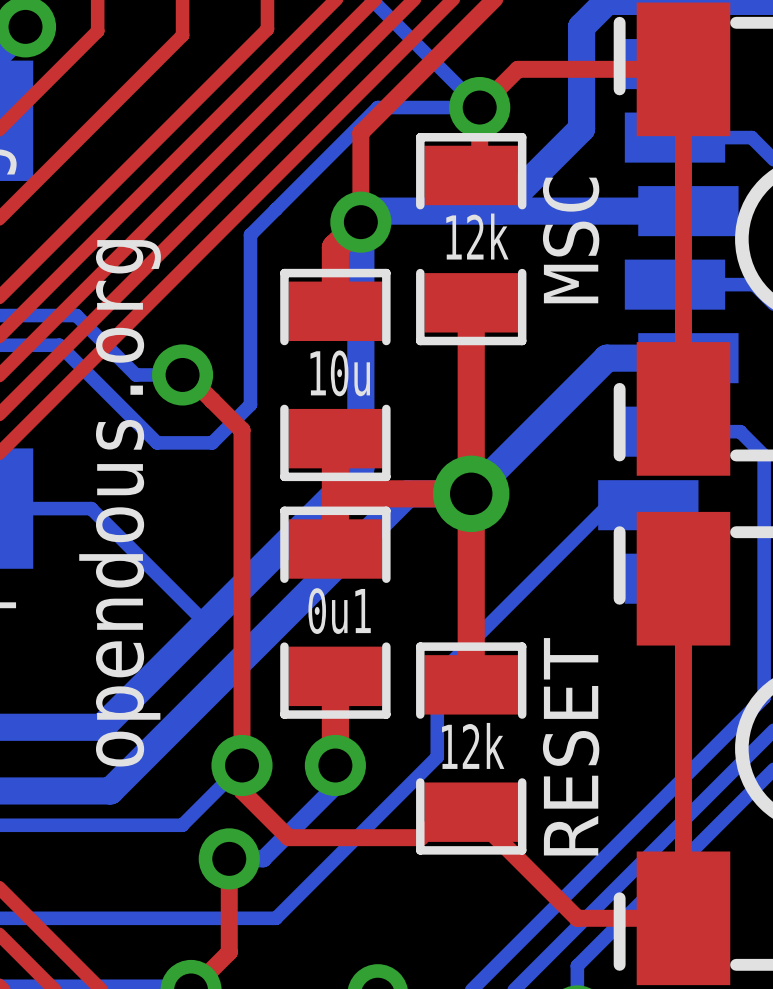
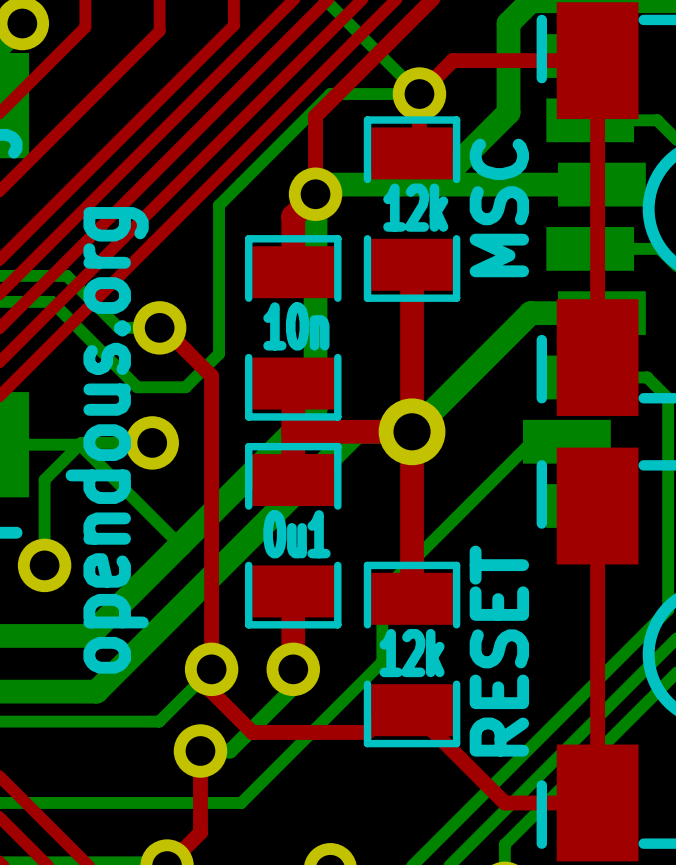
part value: 10u (340, 373) -> 10n (296, 326)
bottom track: none -> (152, 442) (81, 442) (44, 479) (44, 565)
part: none -> (152, 442)
part: none -> (44, 565)

